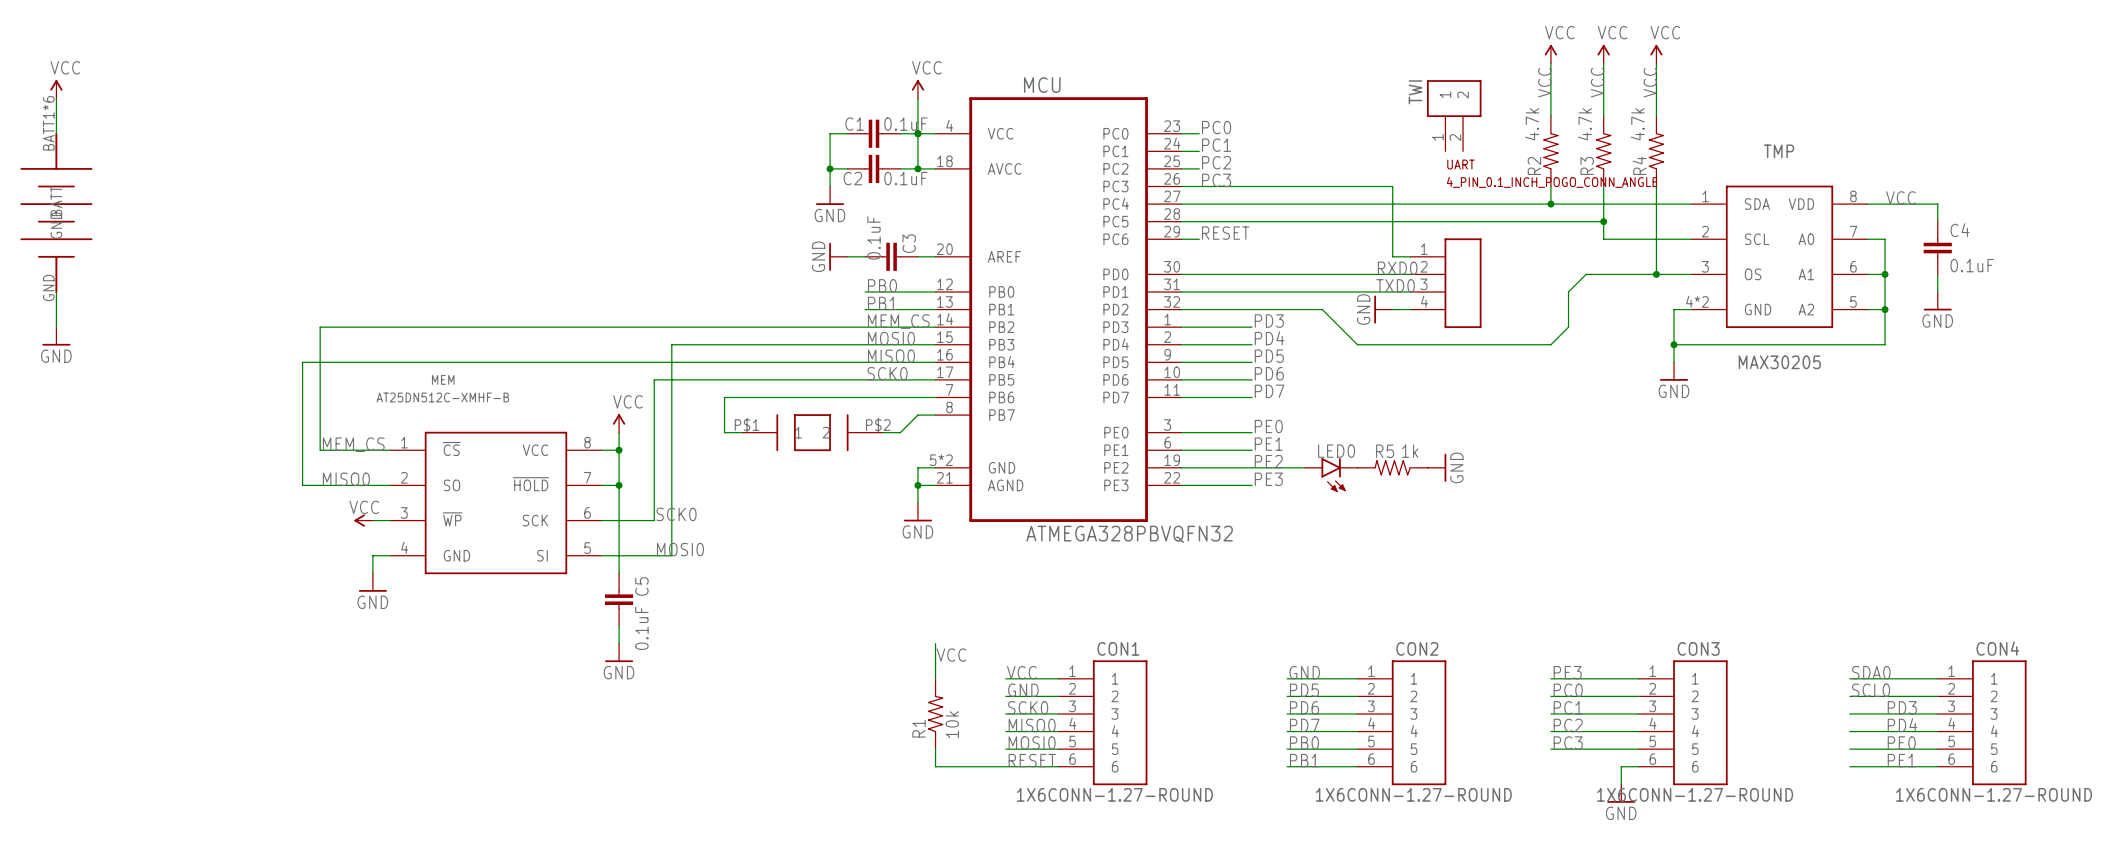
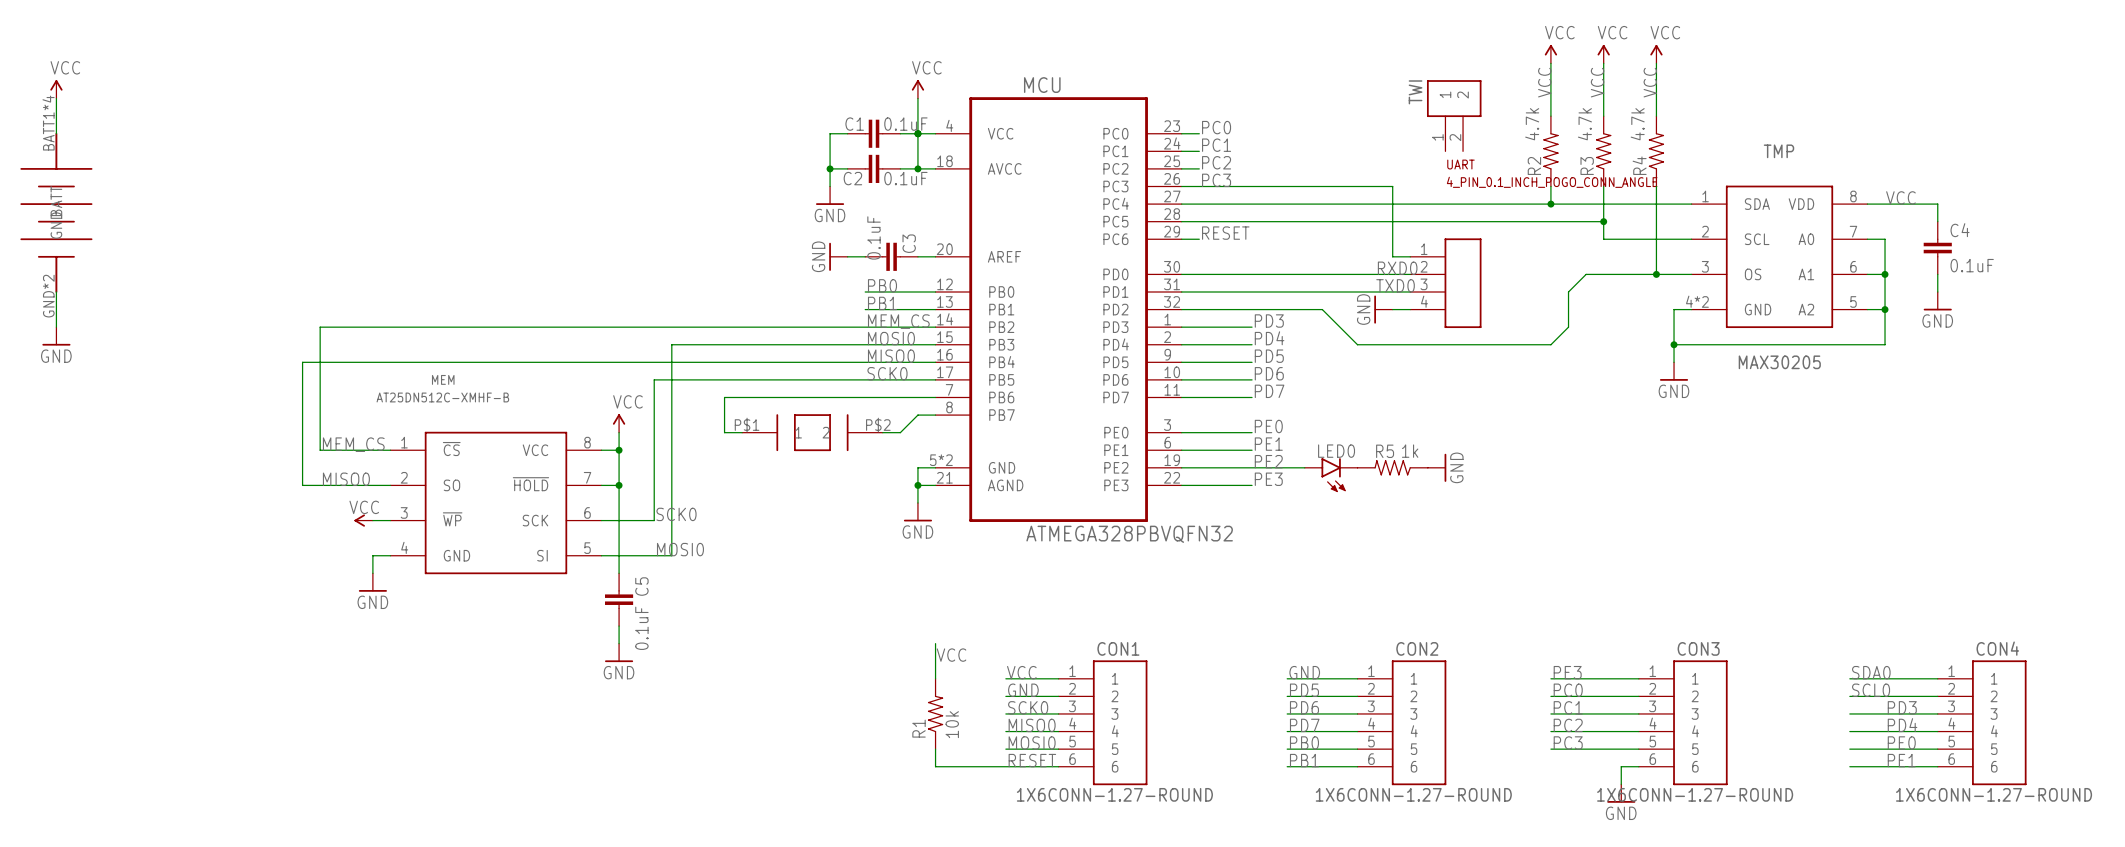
part pin number: BATT1*6 (48, 123) -> BATT1*4 (48, 123)
part pin number: GND (48, 287) -> GND*2 (48, 296)

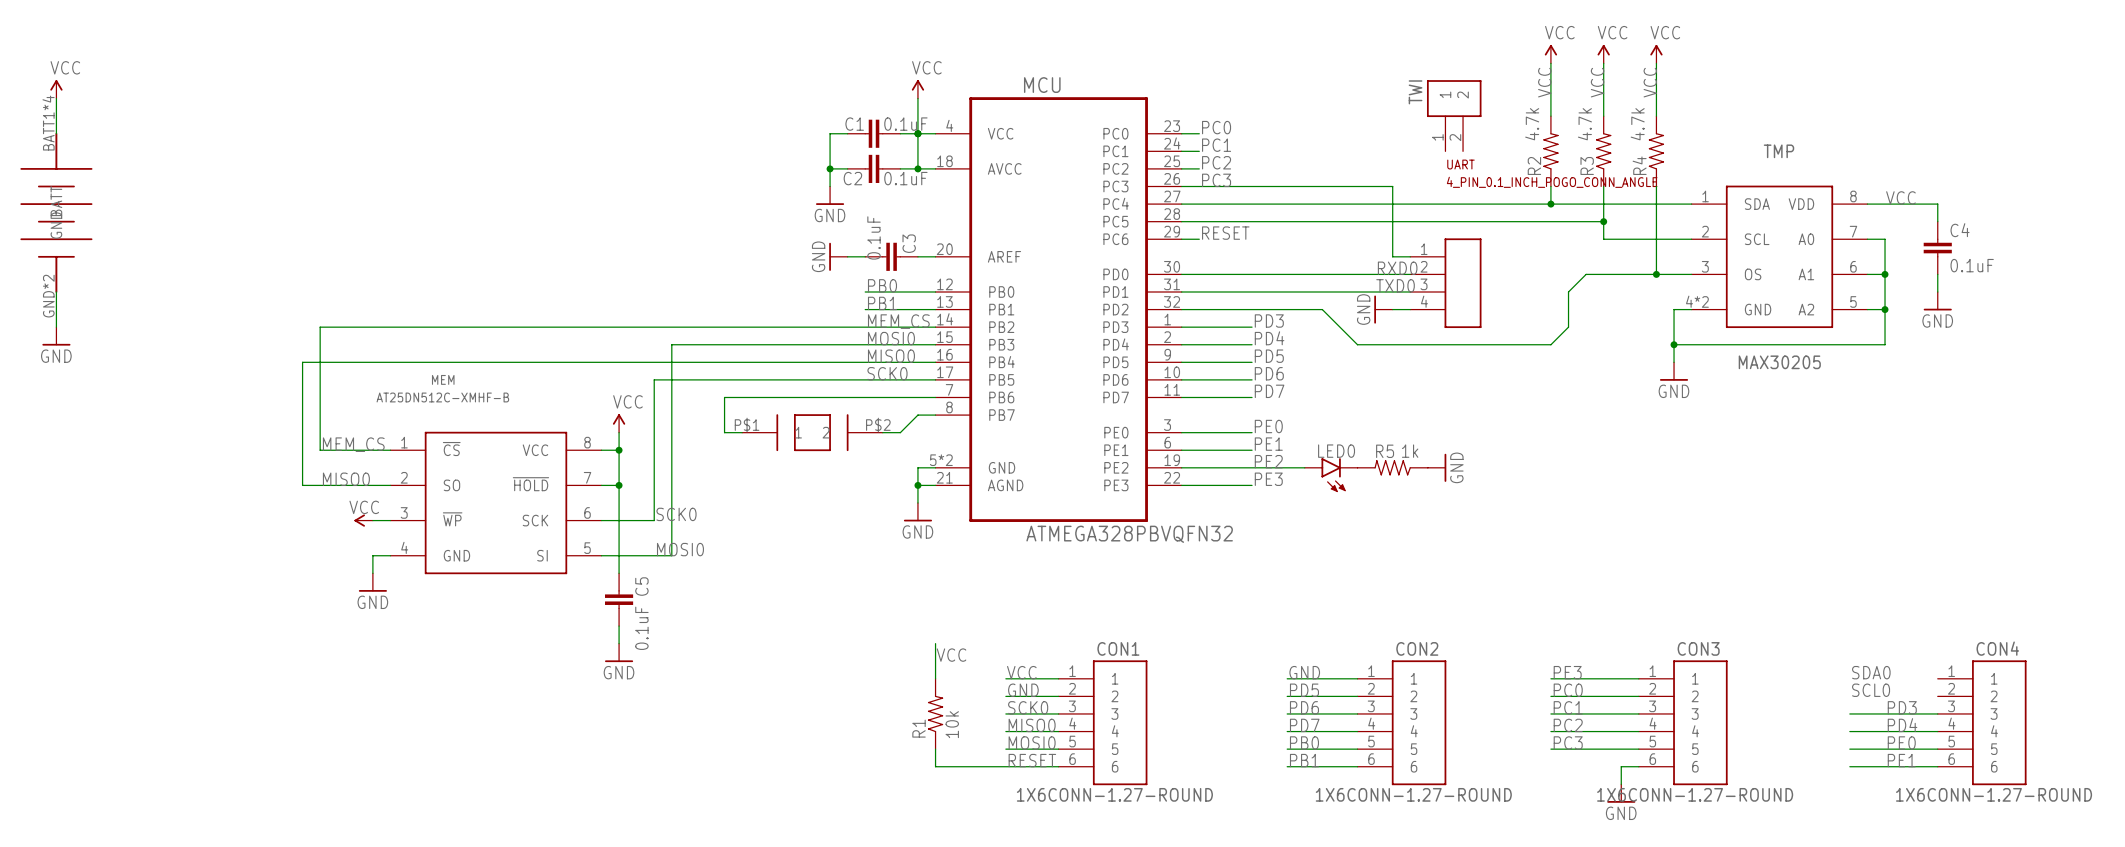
wire: (1849, 678) (1937, 678) -> none
wire: (1849, 696) (1937, 696) -> none

